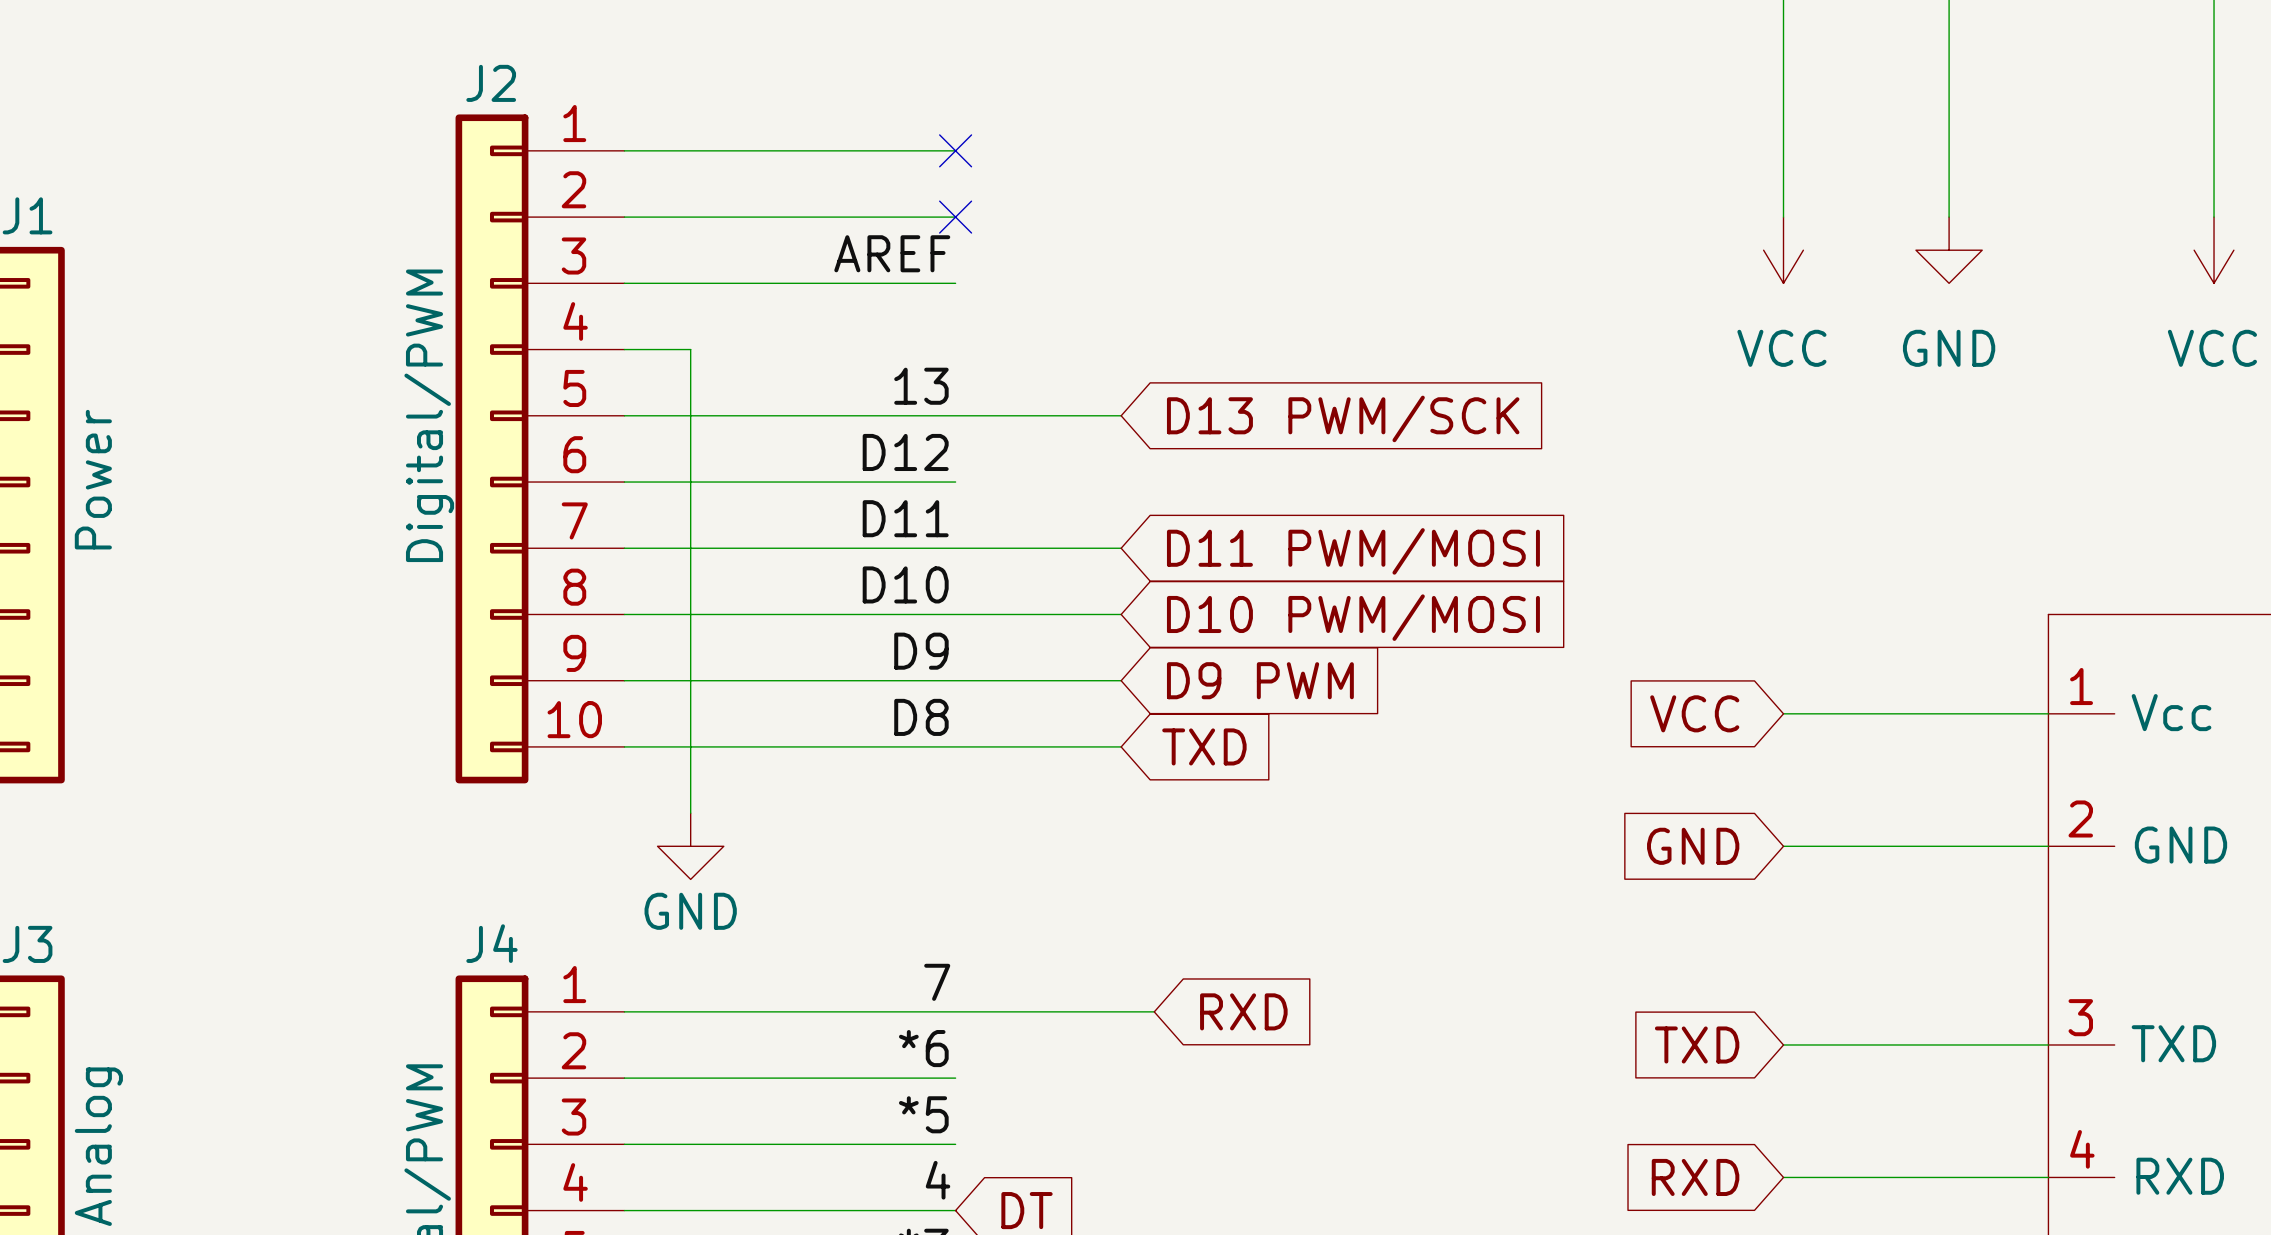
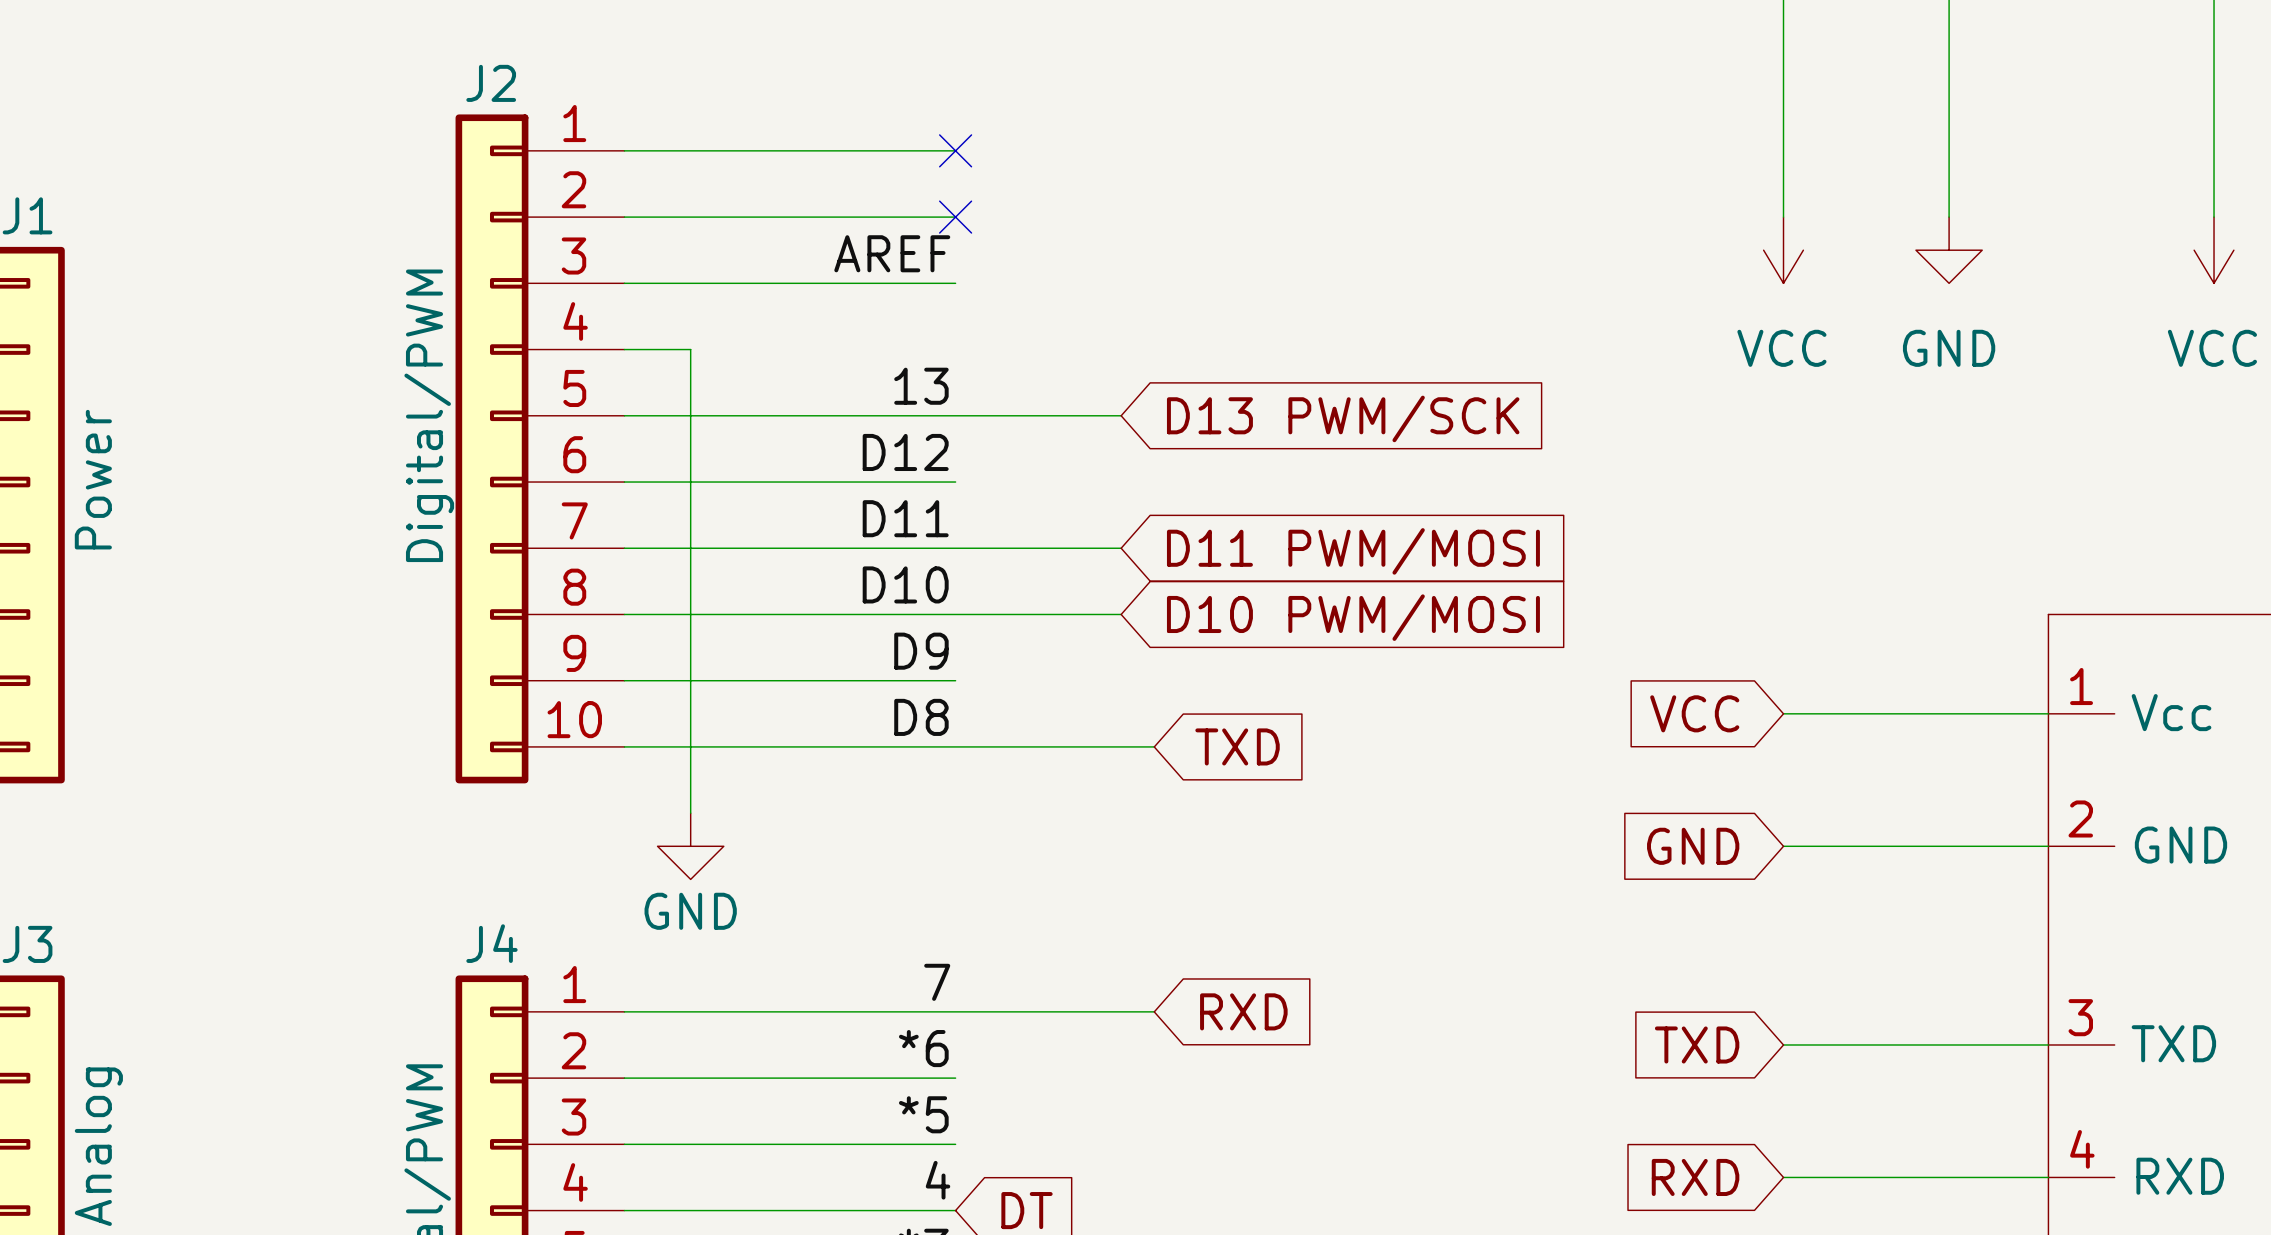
wire: (955, 680) (1121, 680) -> none
global label: D9 PWM (1260, 680) -> none
wire: none -> (1121, 746) (1154, 746)
global label position: TXD (1204, 746) -> TXD (1237, 746)

